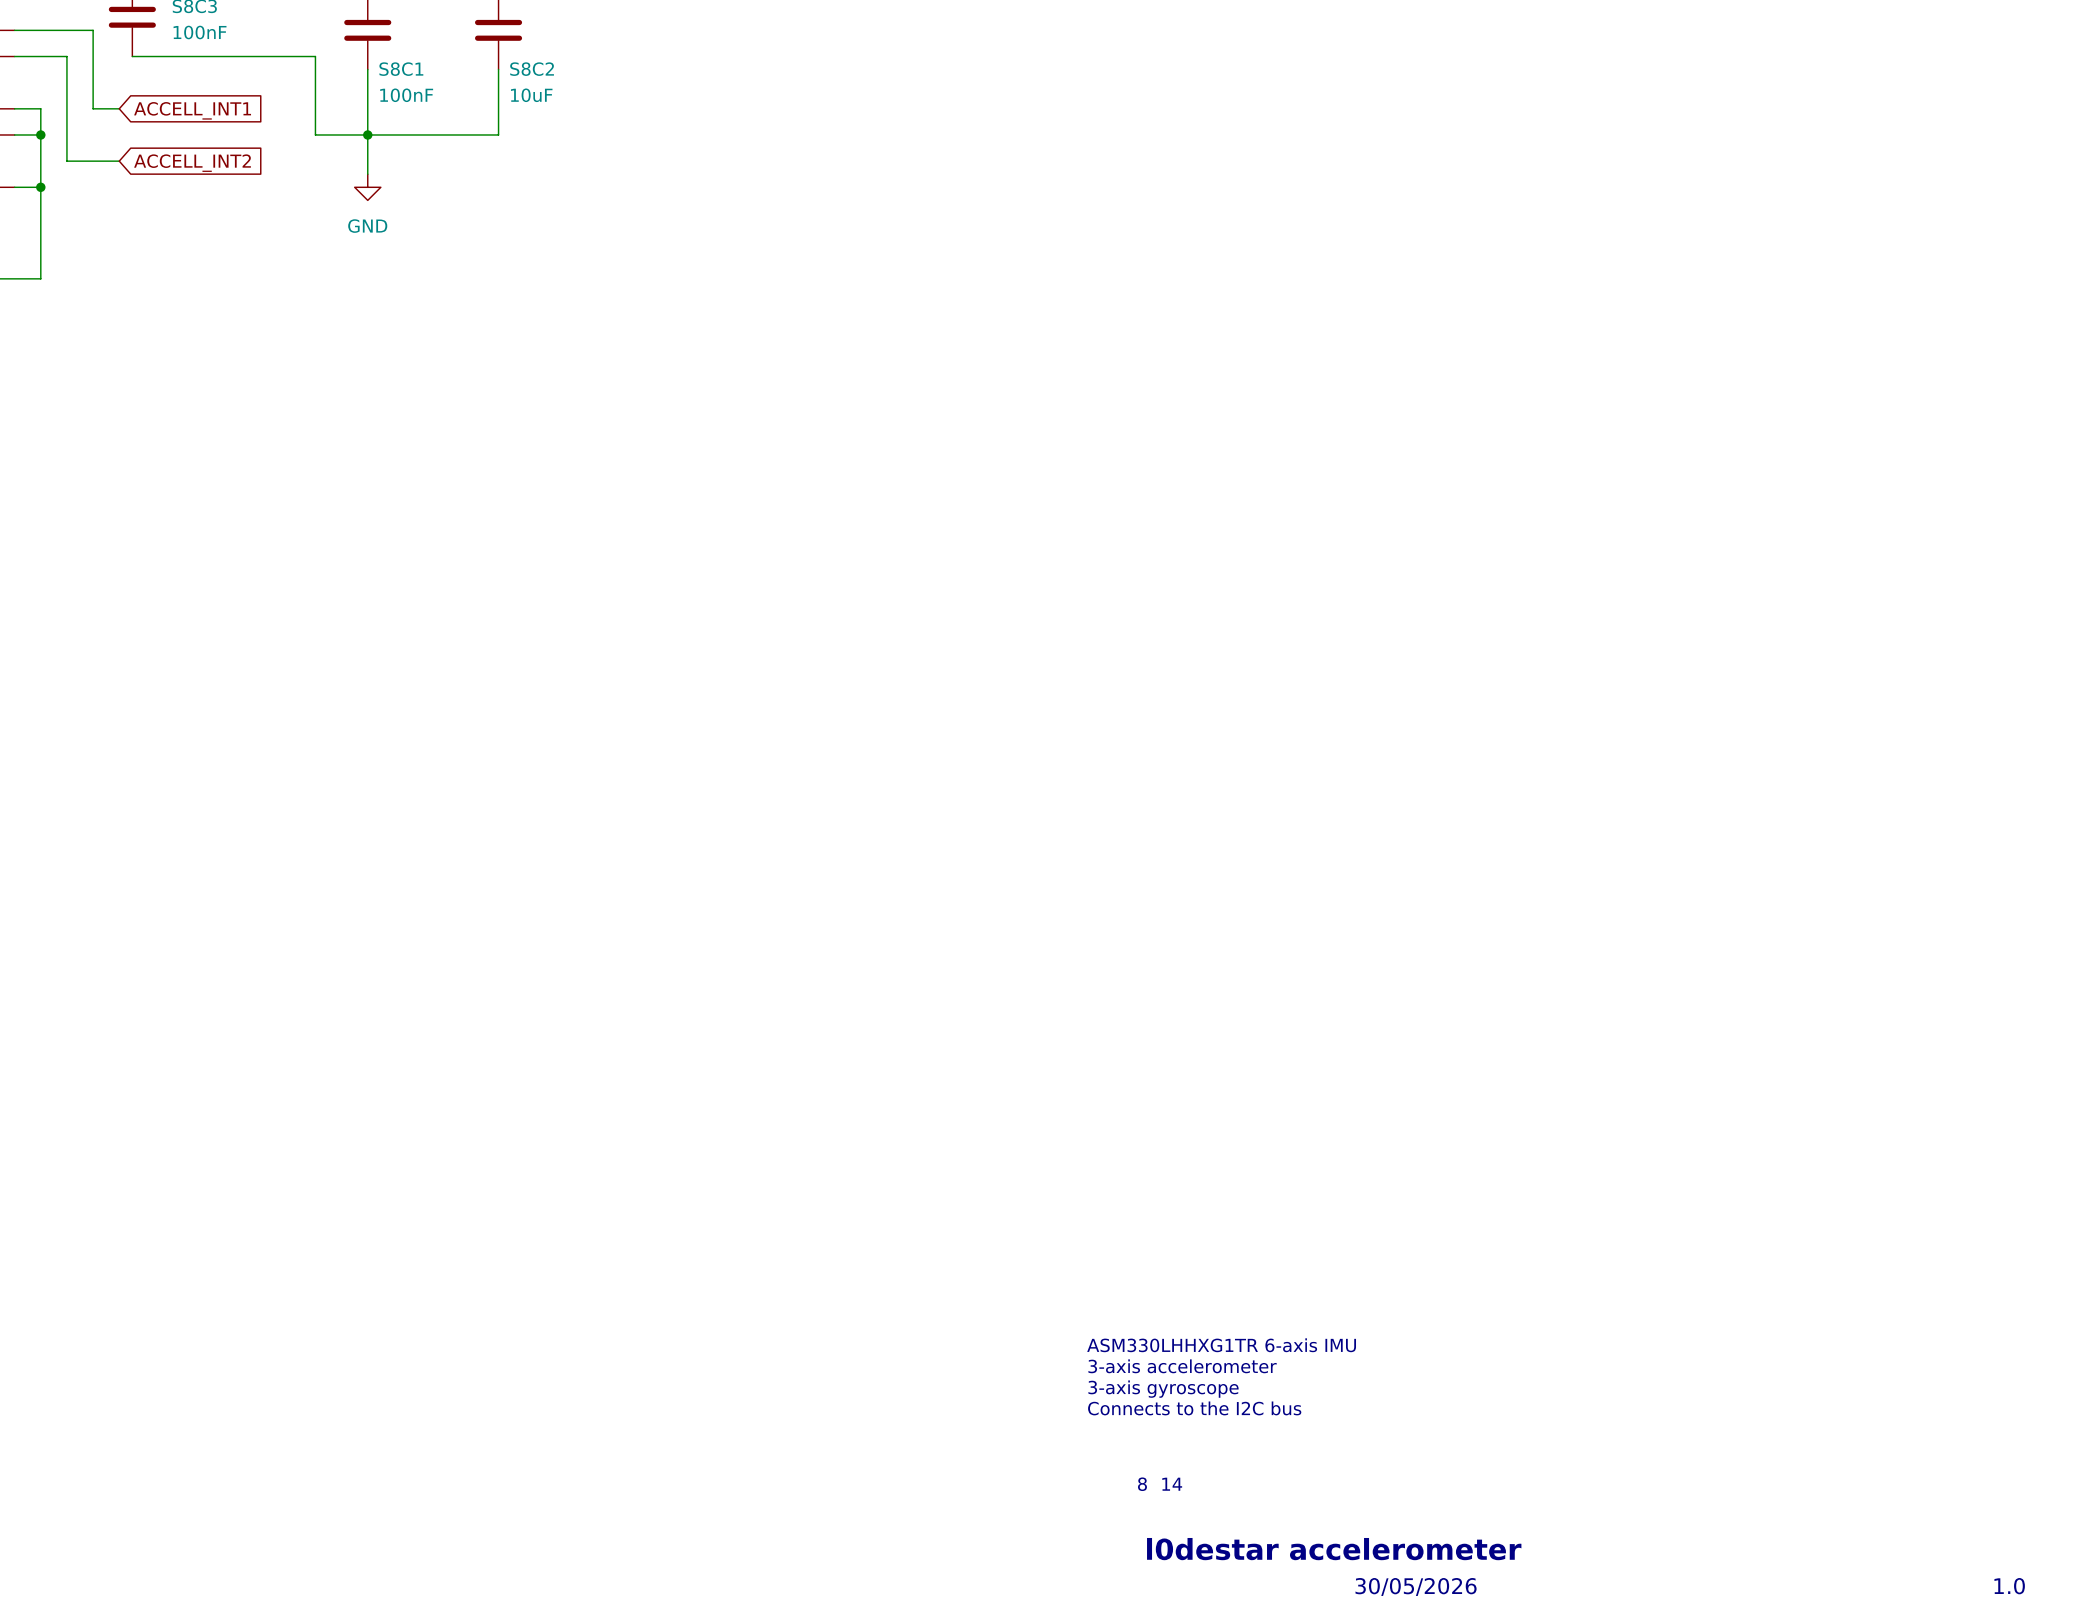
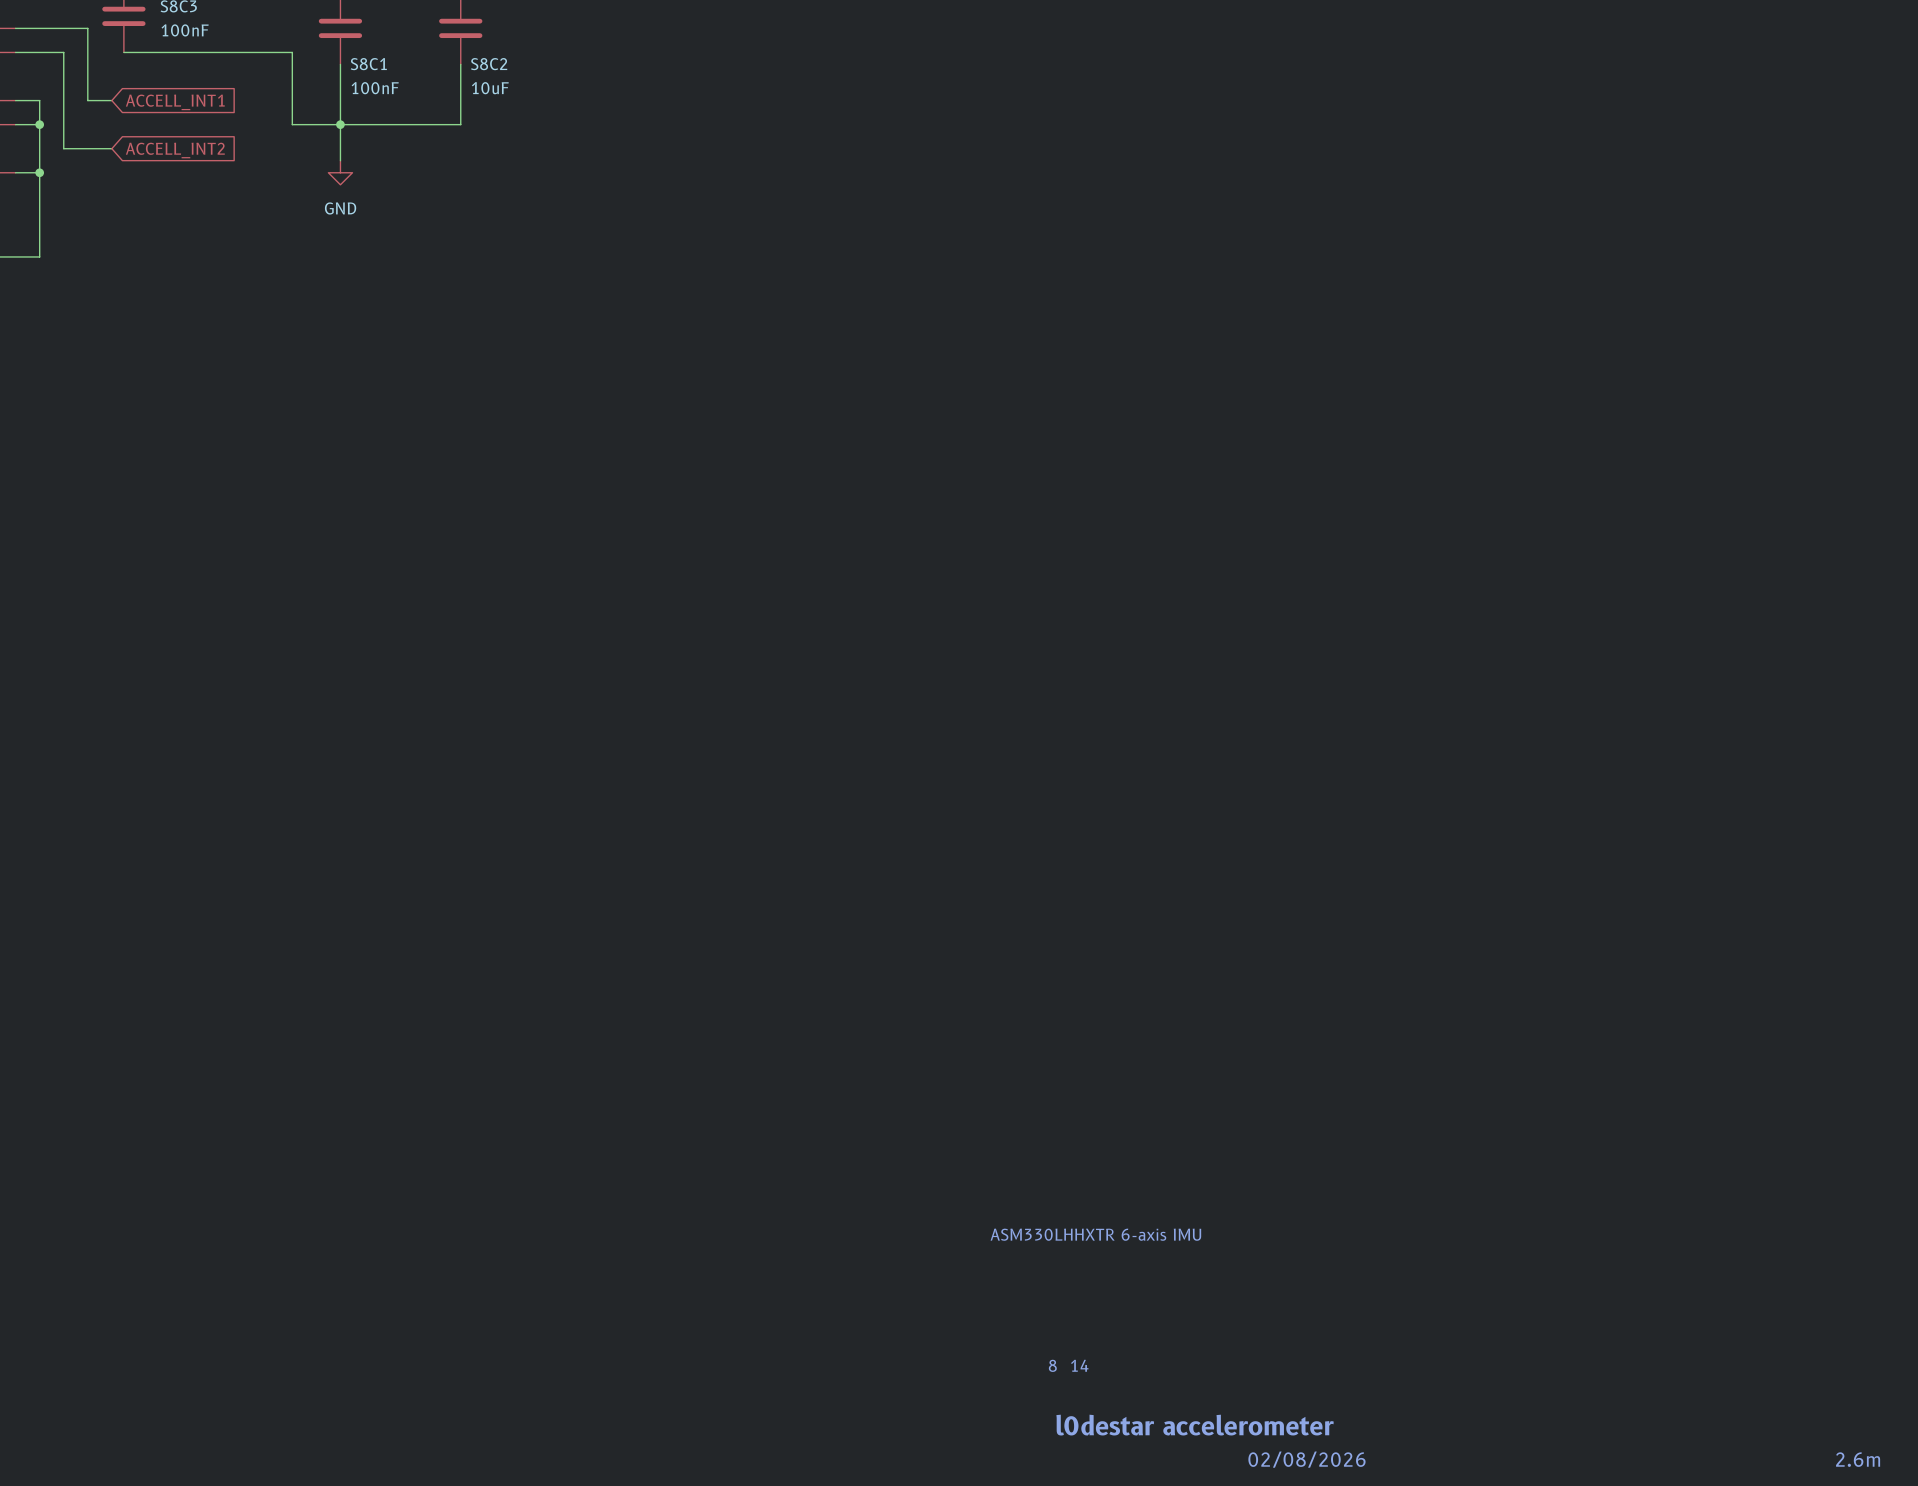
text: ASM330LHHXG1TR 6-axis IMU (1221, 1345) -> ASM330LHHXTR 6-axis IMU (1095, 1234)
text: 3-axis accelerometer (1182, 1366) -> none
text: 3-axis gyroscope (1163, 1389) -> none
text: Connects to the I2C bus (1194, 1408) -> none
text: 1.0 (2009, 1586) -> 2.6m (1858, 1459)
text: 30/05/2026 (1416, 1587) -> 02/08/2026 (1306, 1459)

